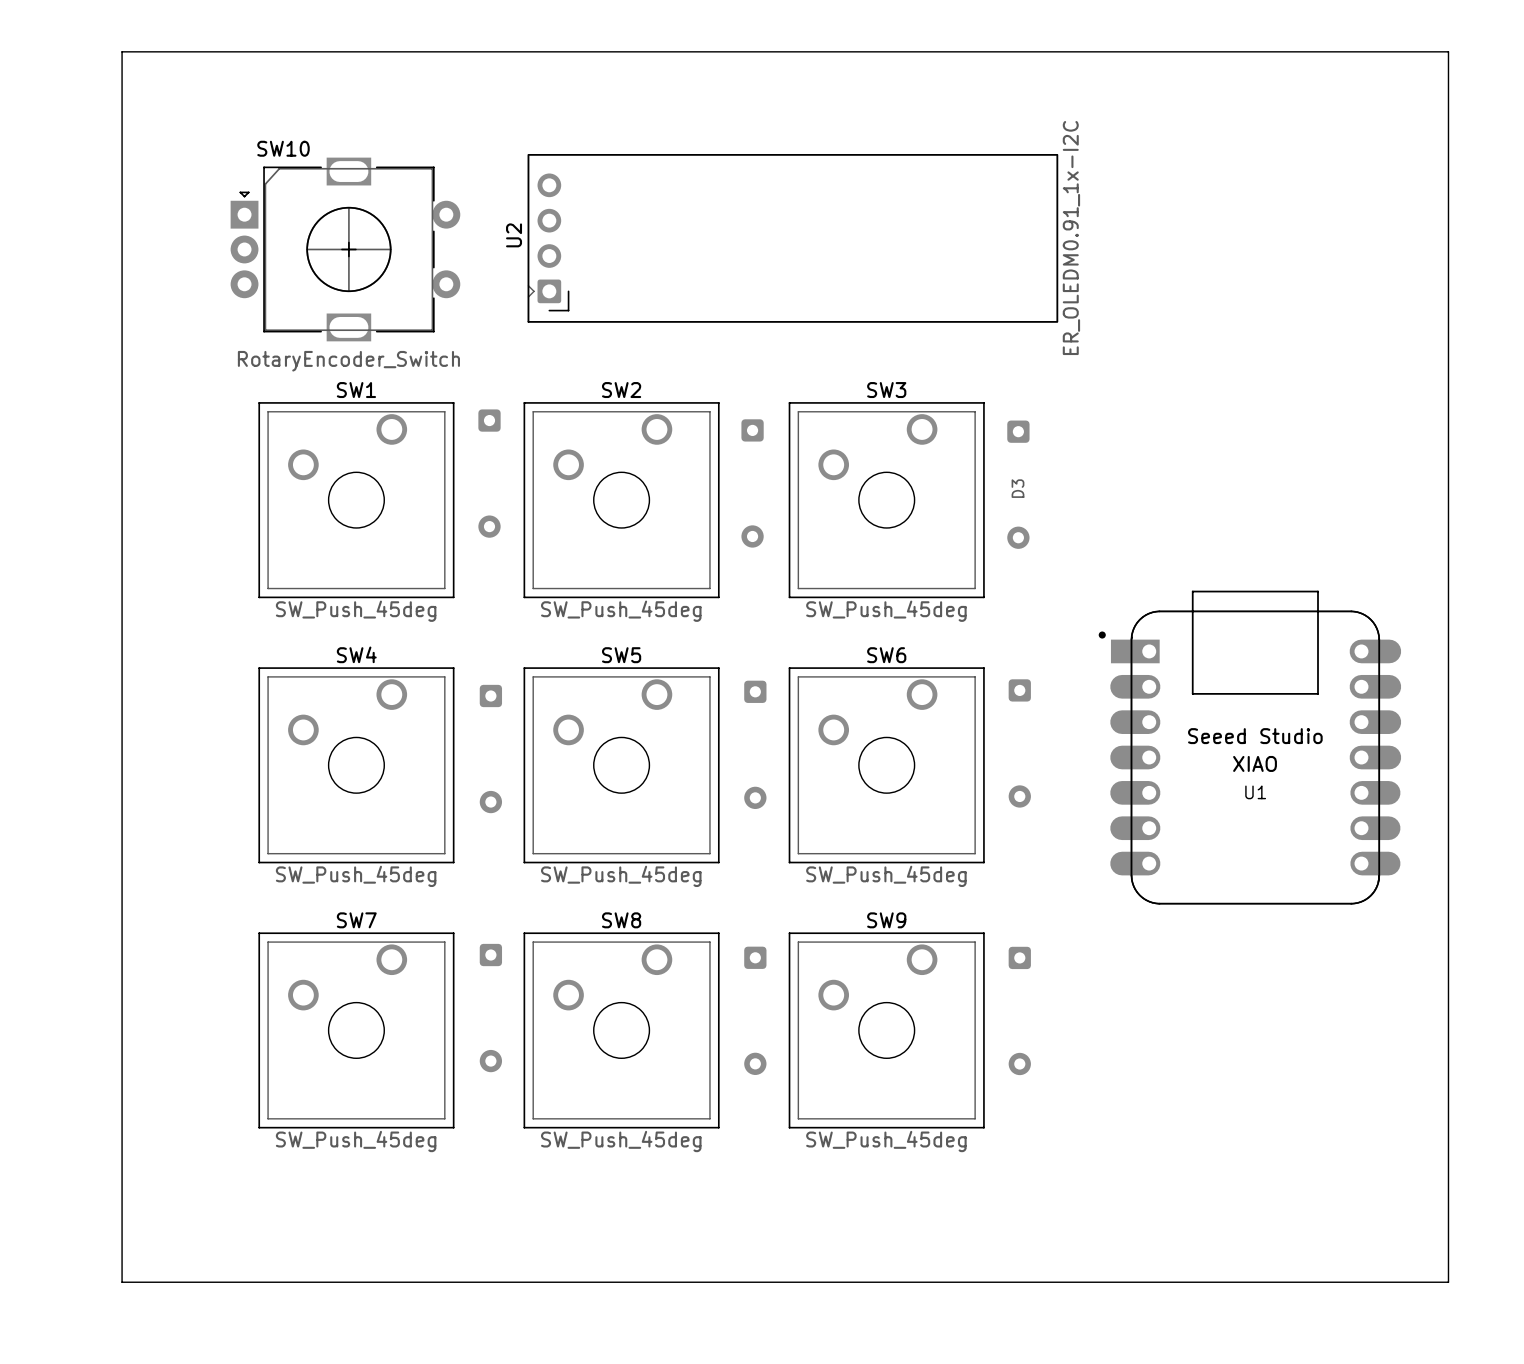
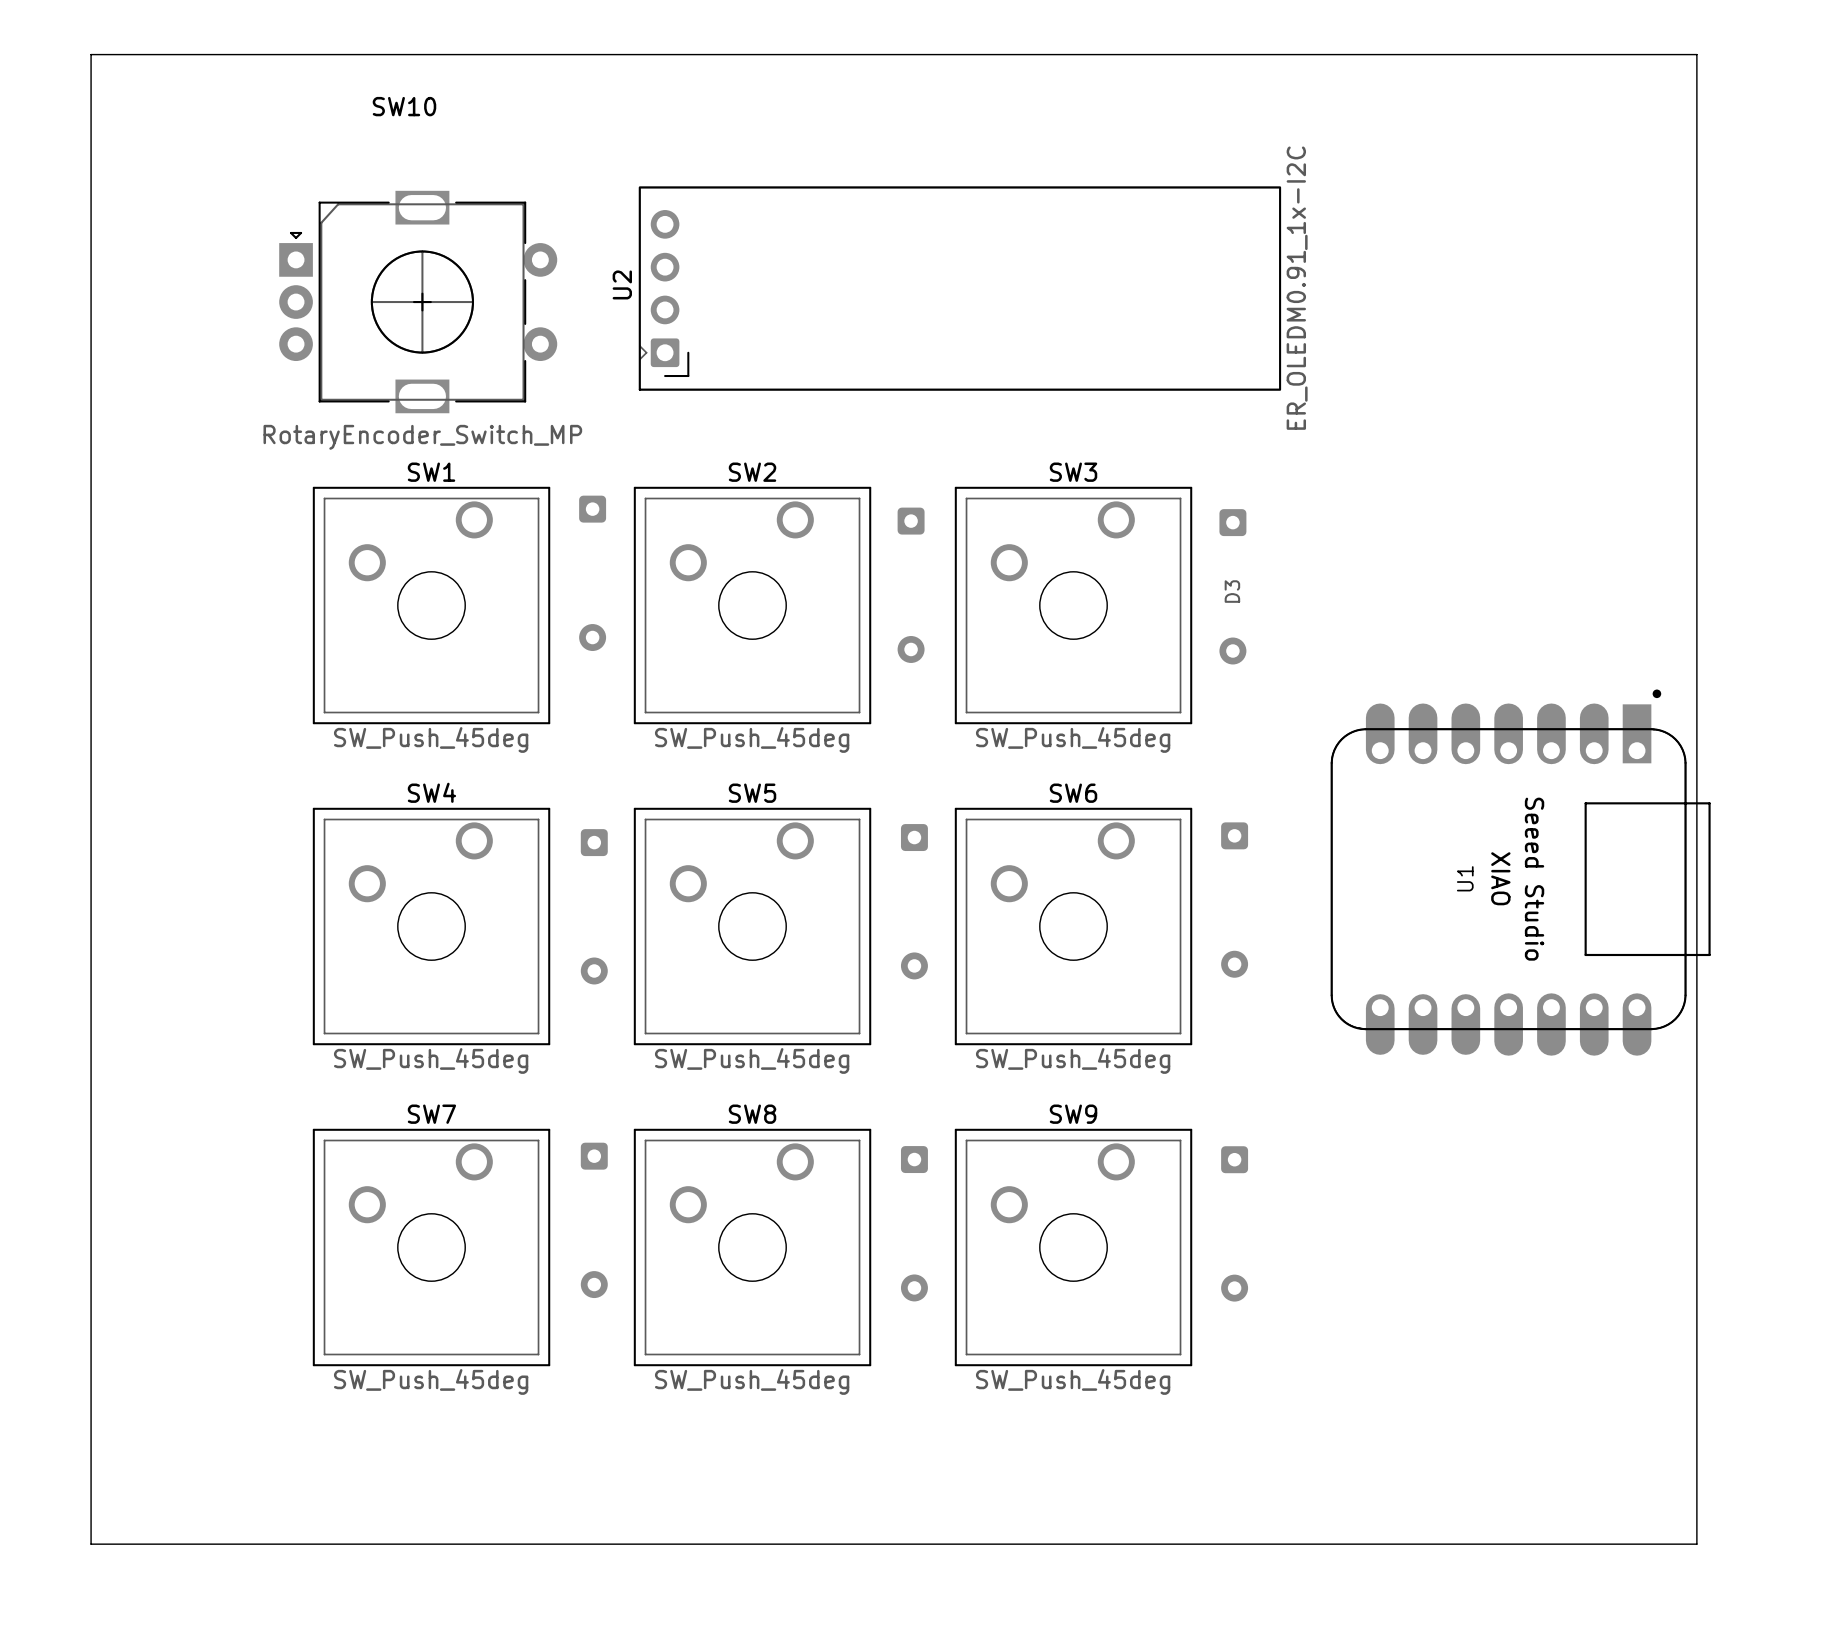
board edge: (122, 51) (1448, 51) (1448, 1282) (122, 1282) (122, 51) -> (91, 54) (91, 1544) (1696, 1544) (1696, 54) (91, 54)
SW10 name position: SW10 (283, 148) -> SW10 (404, 106)
SW10 value: RotaryEncoder_Switch (348, 361) -> RotaryEncoder_Switch_MP (422, 437)
U1 footprint: [1098, 590, 1402, 905] -> [1330, 689, 1711, 1056]
U1 name position: U1 (1255, 792) -> U1 (1465, 878)

